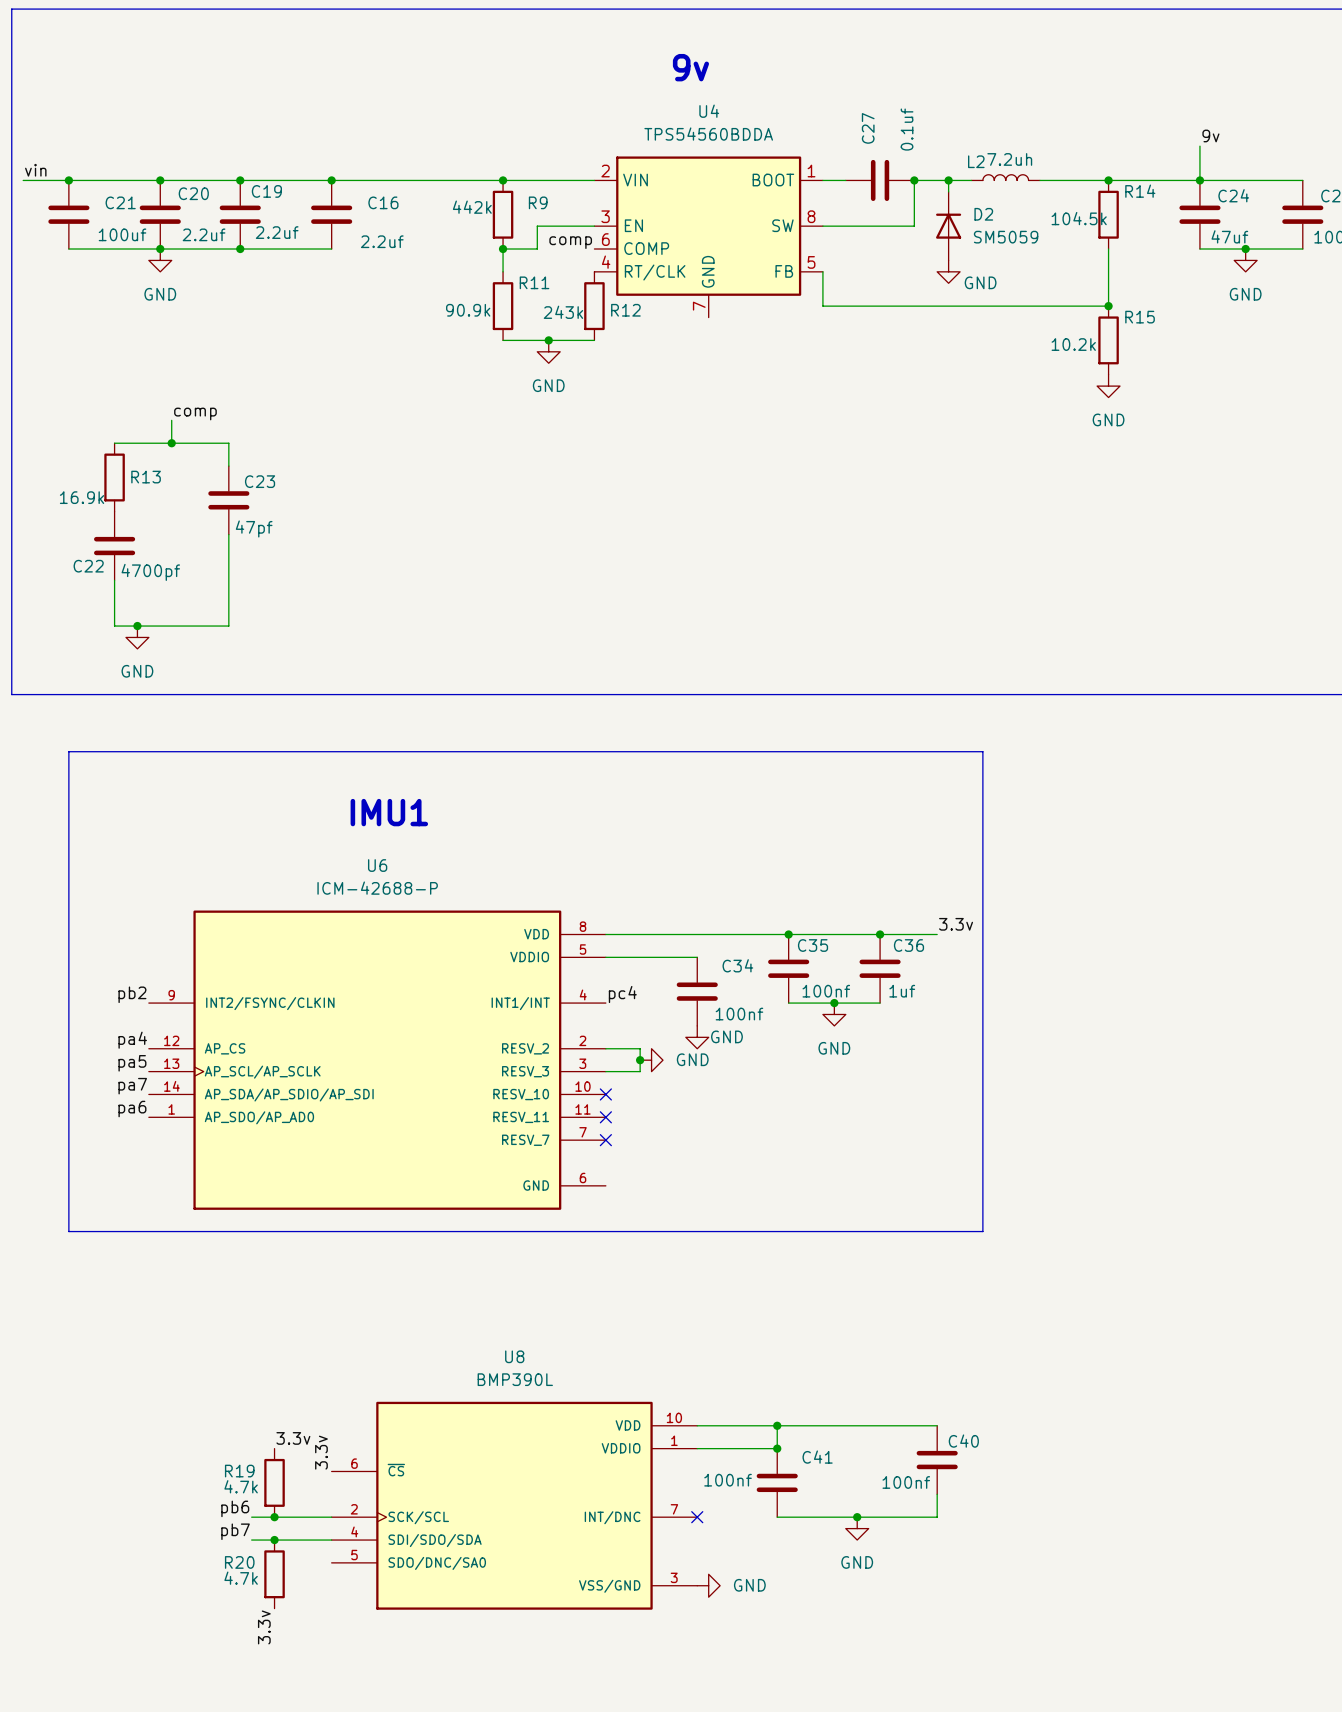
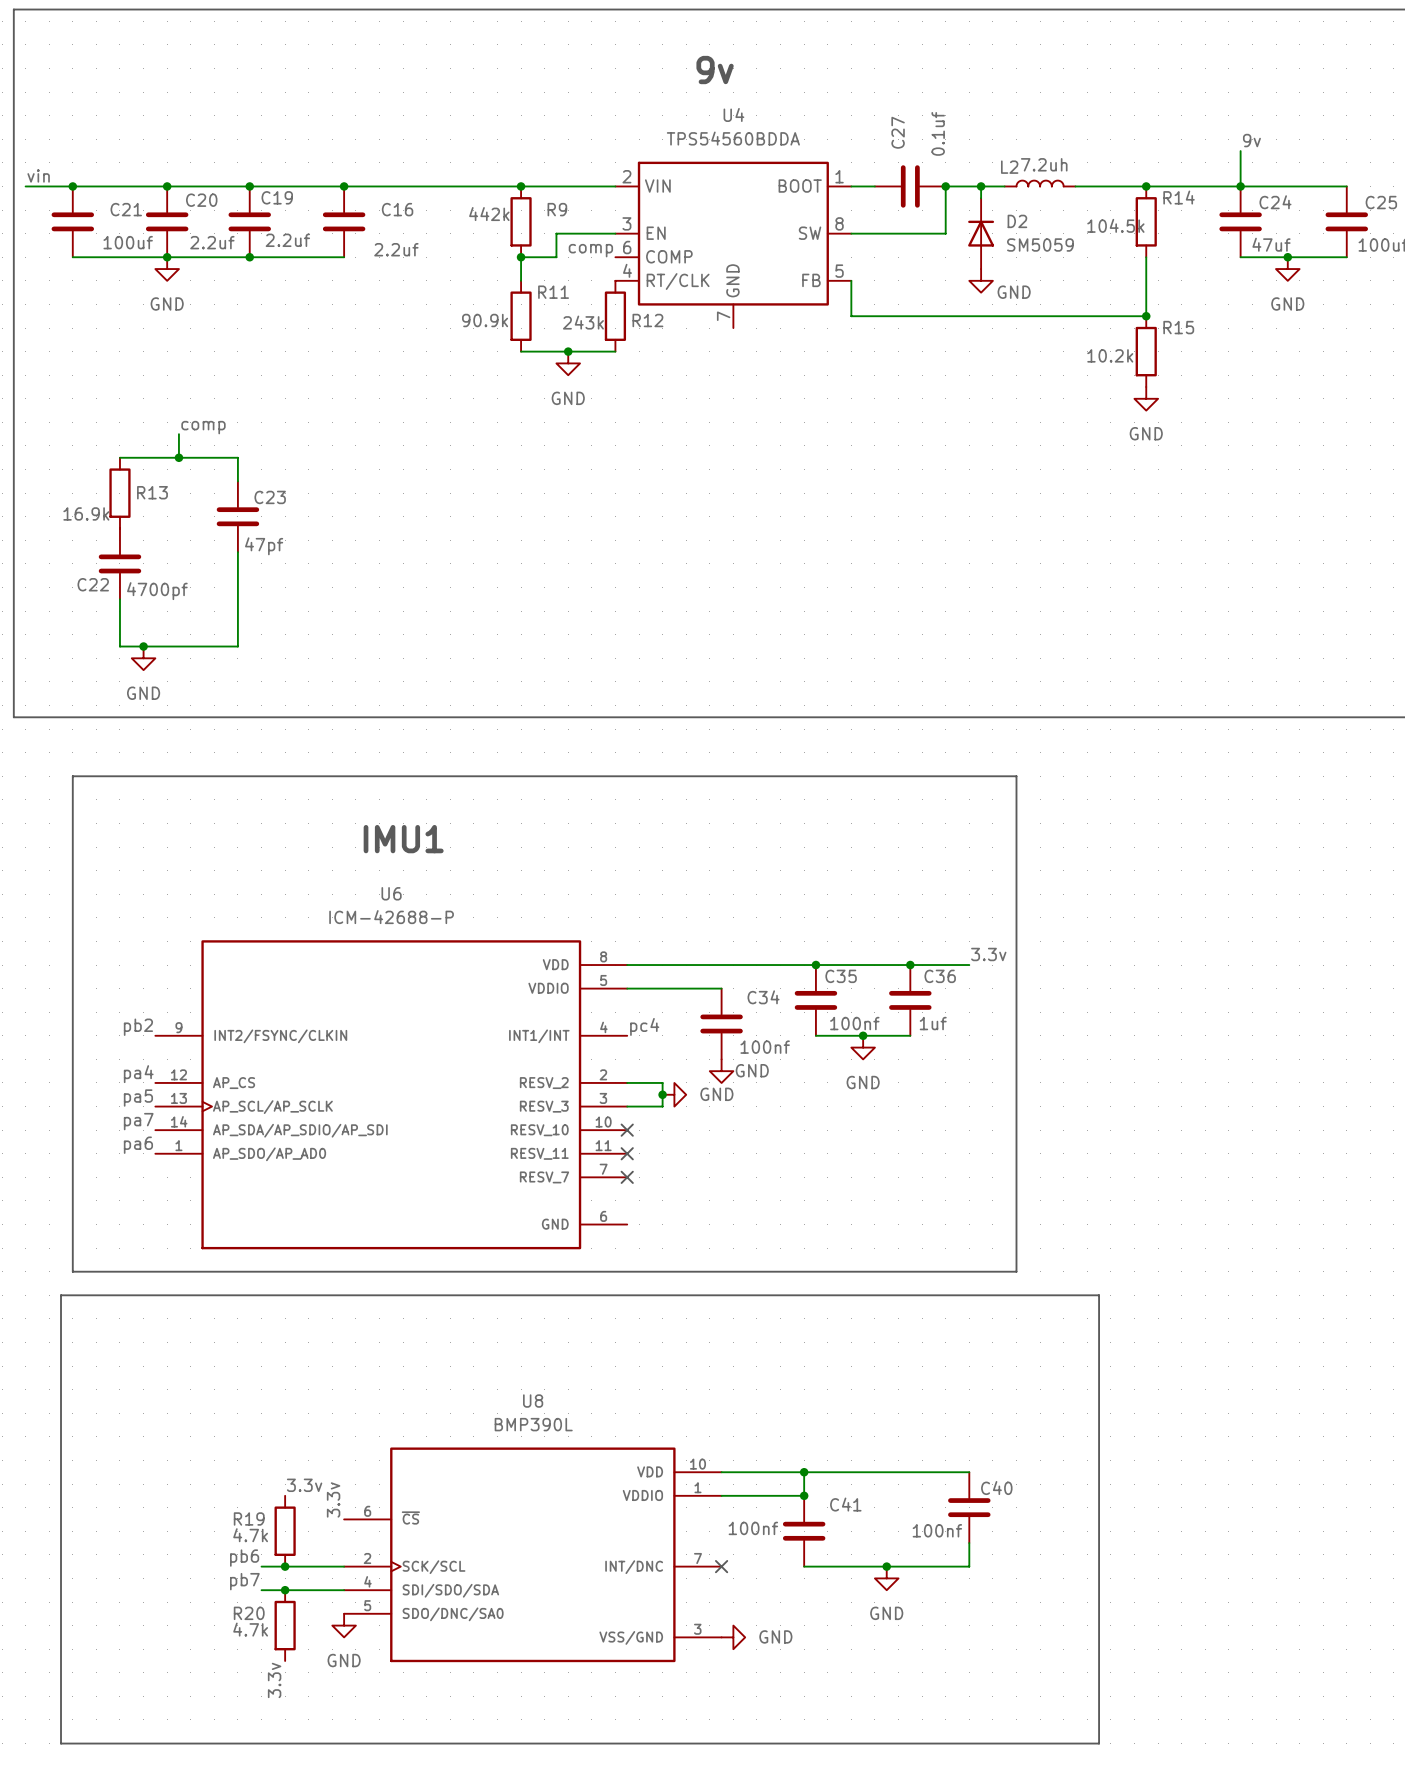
line: none -> (61, 1295) (1099, 1295) (1099, 1743) (61, 1743) (61, 1295)
power symbol: none -> GND (344, 1625)

